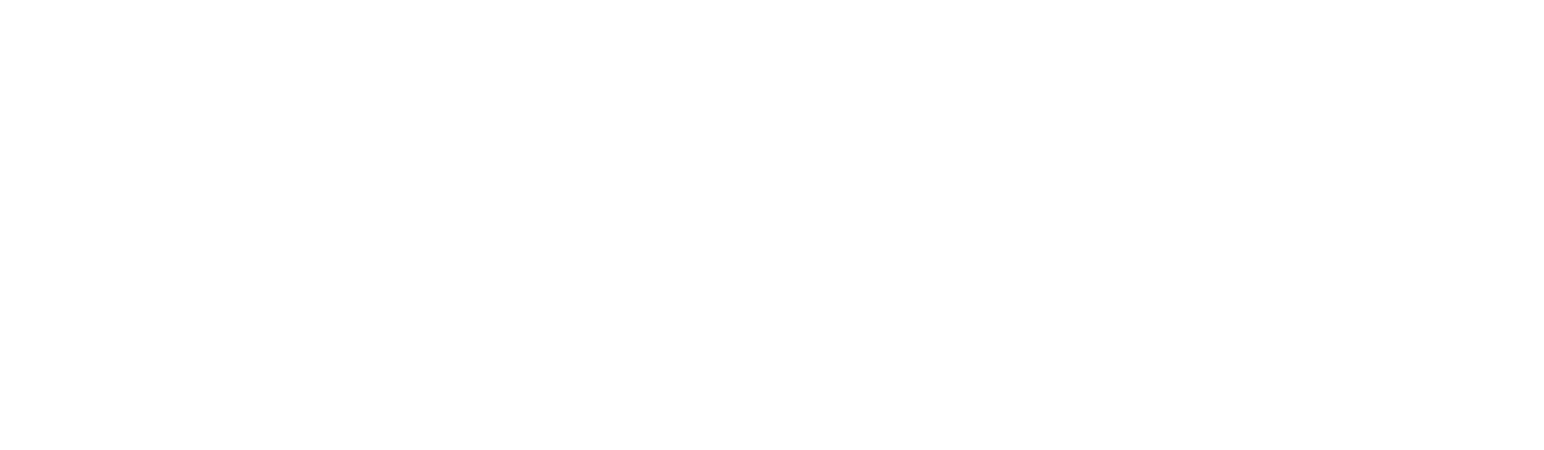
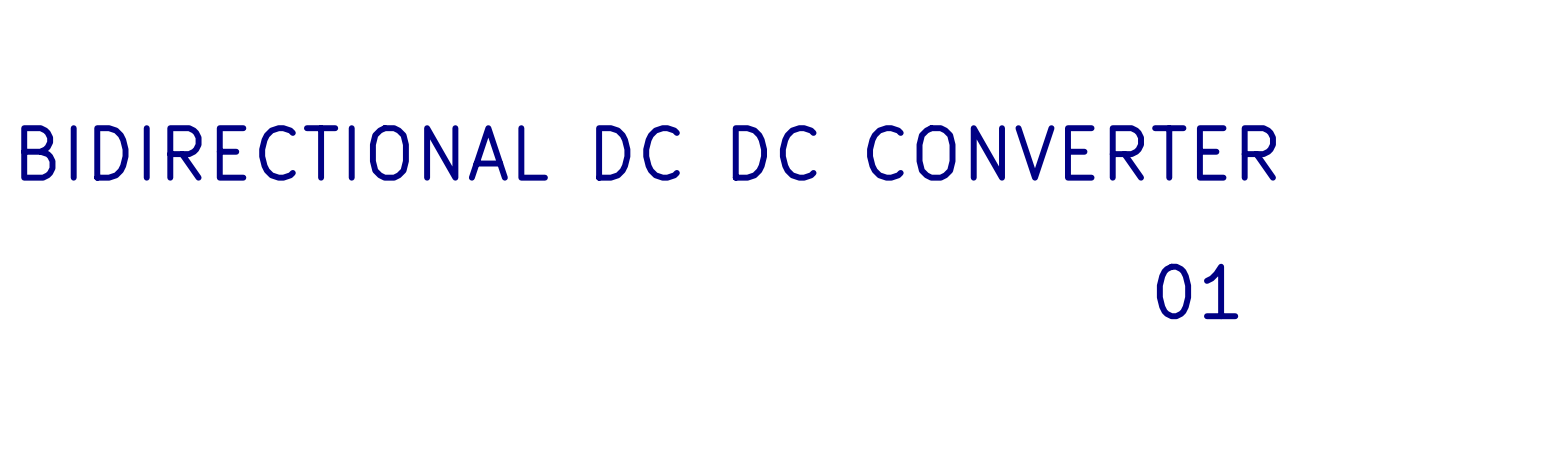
text: none -> BIDIRECTIONAL DC DC CONVERTER (648, 152)
text: none -> 01 (1197, 291)

